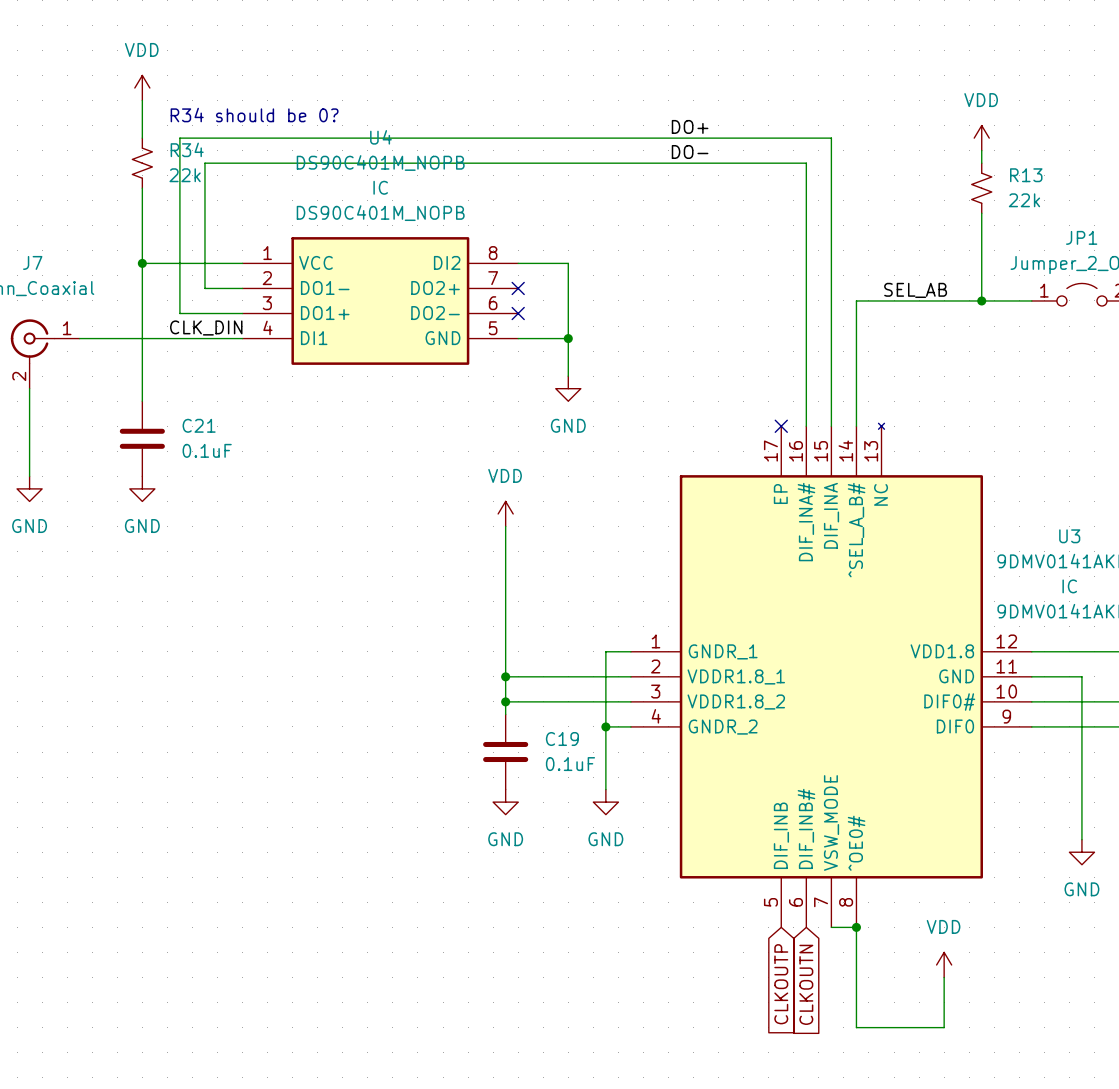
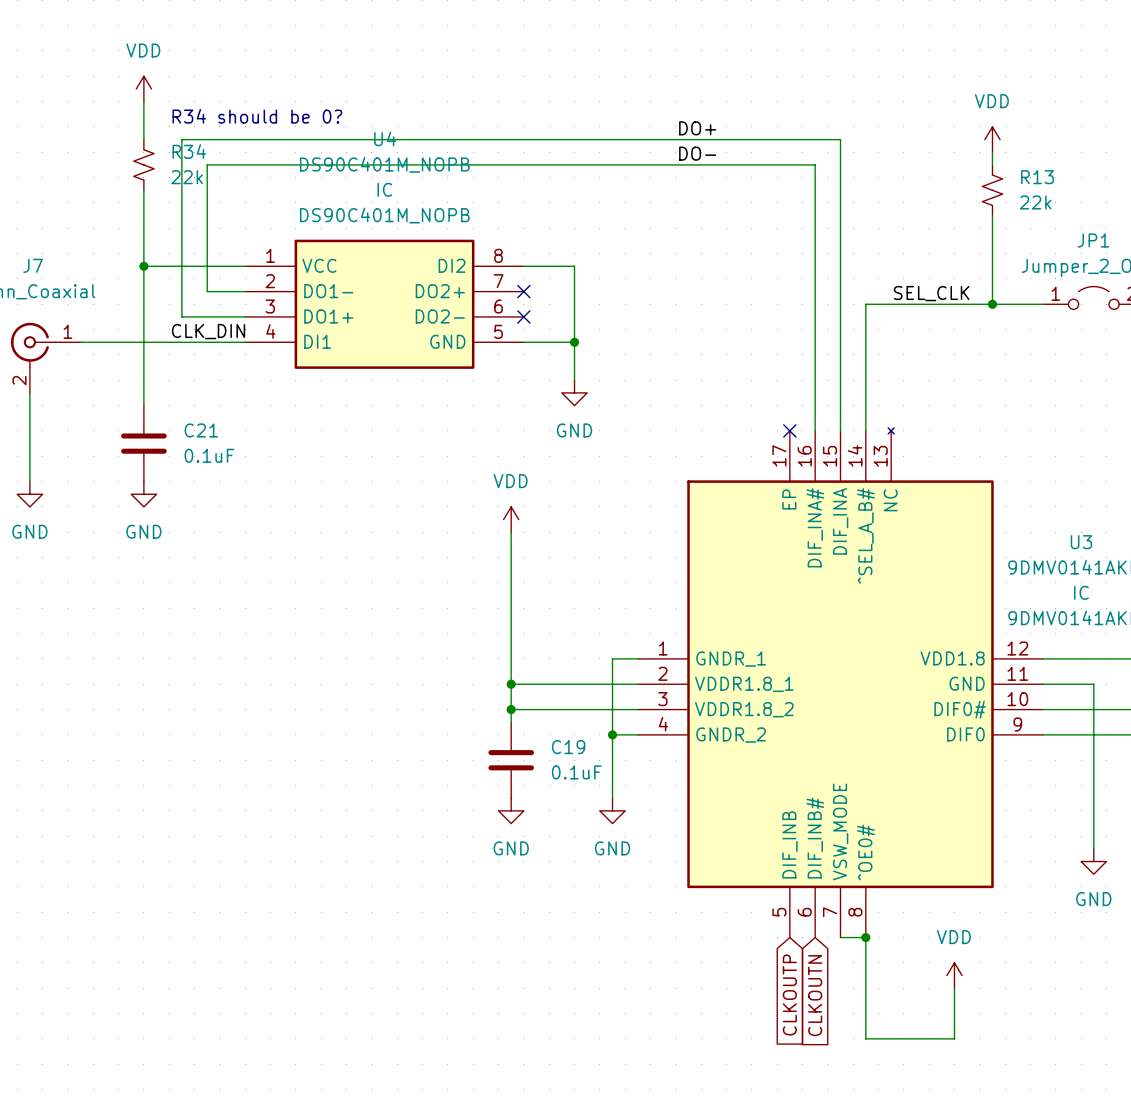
label: SEL_AB (915, 290) -> SEL_CLK (931, 293)

